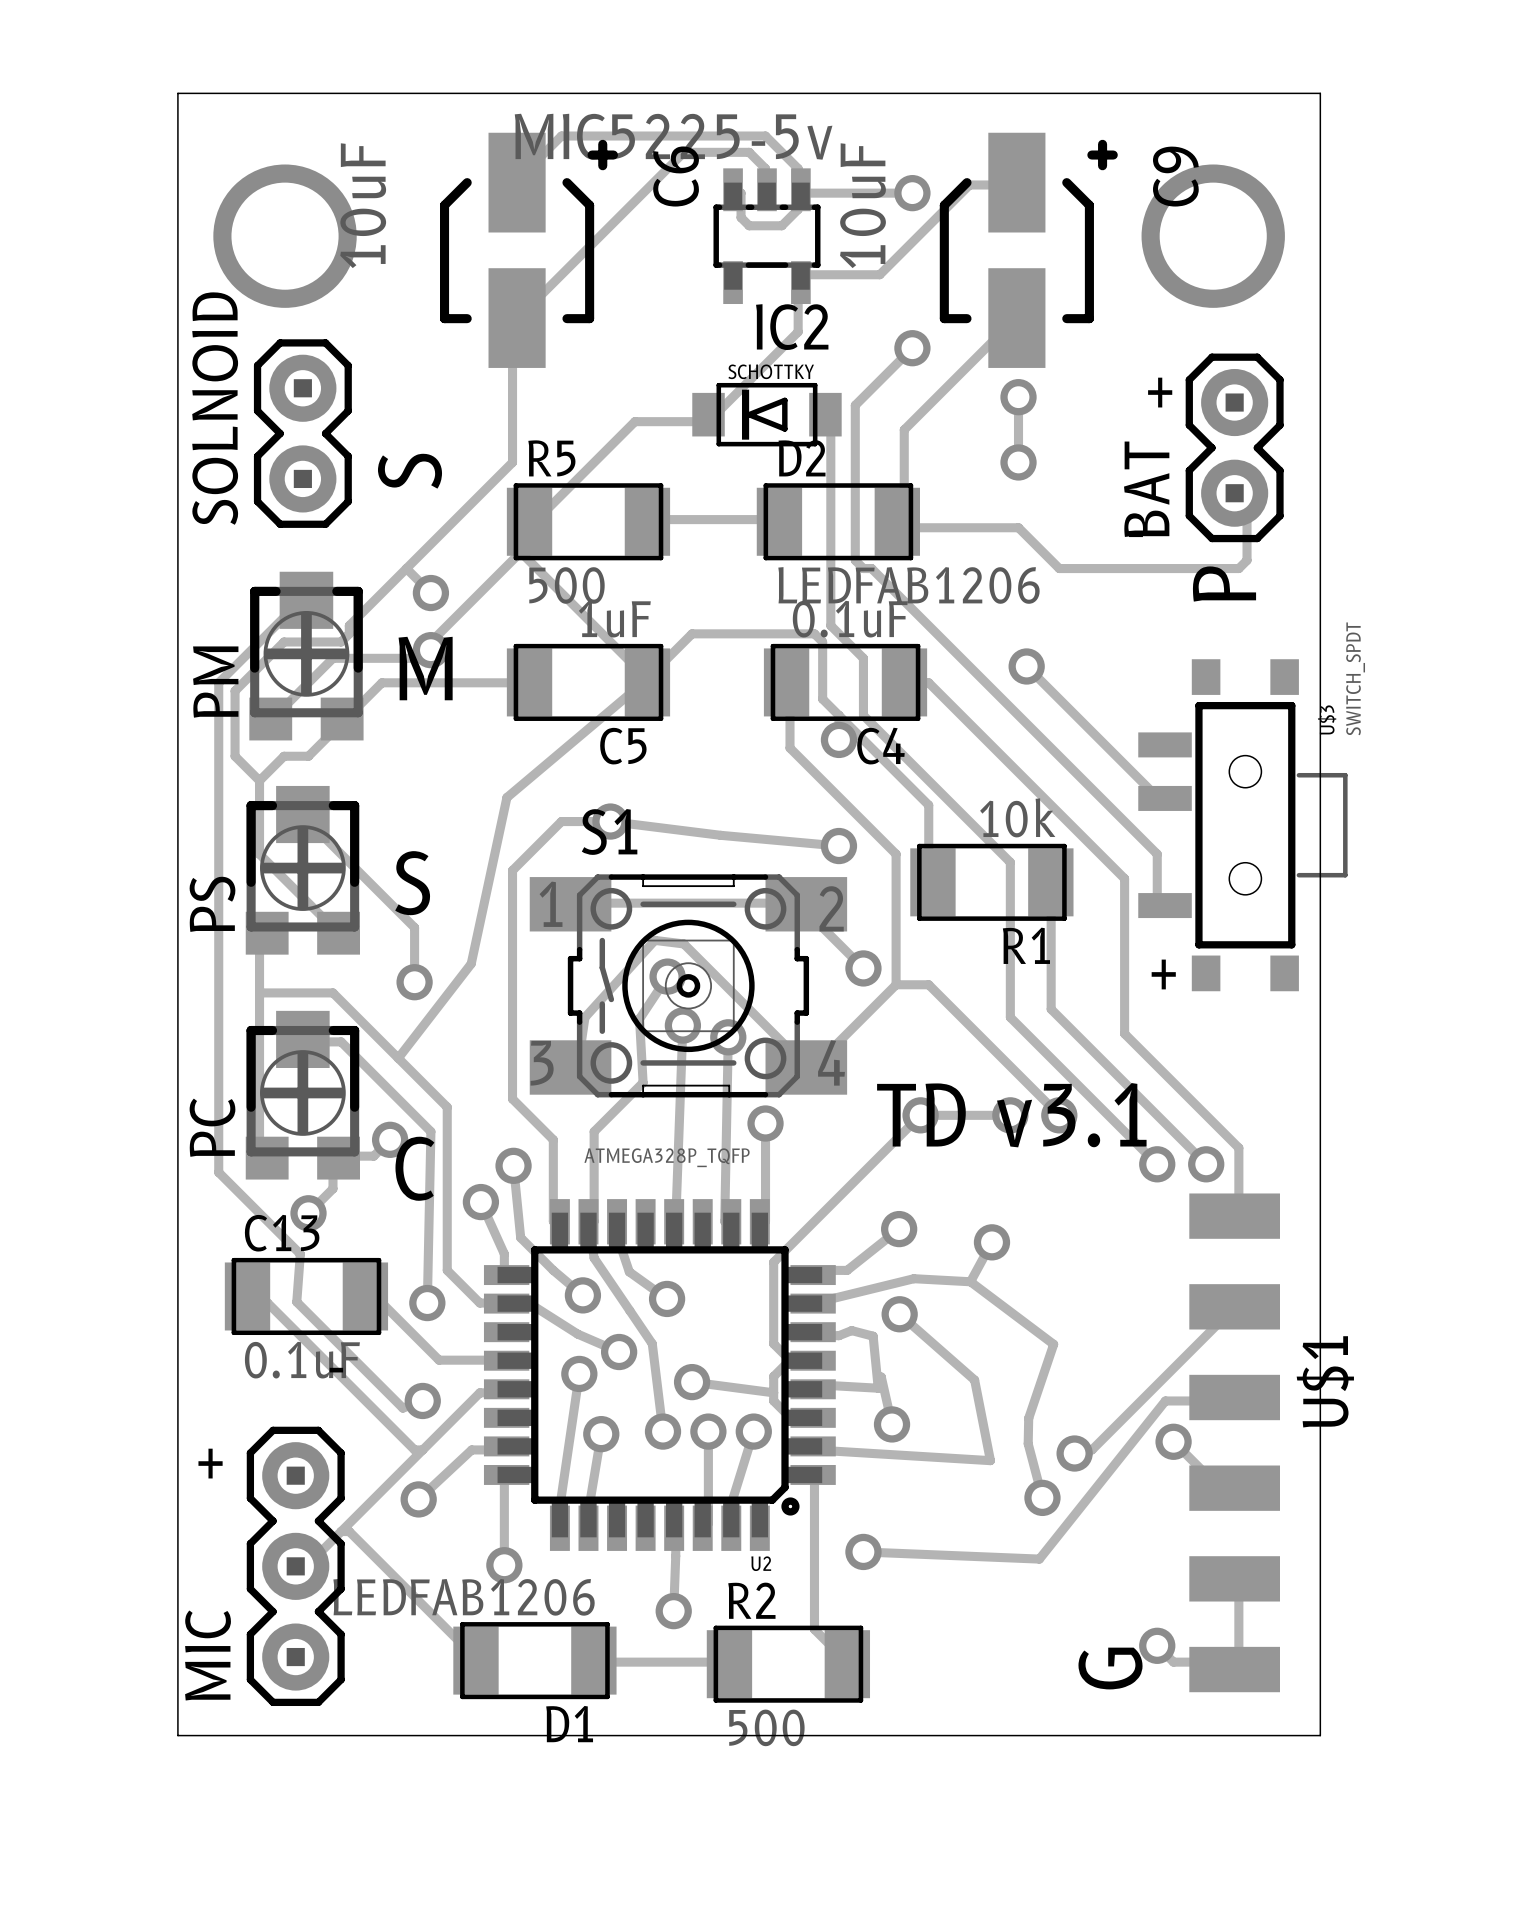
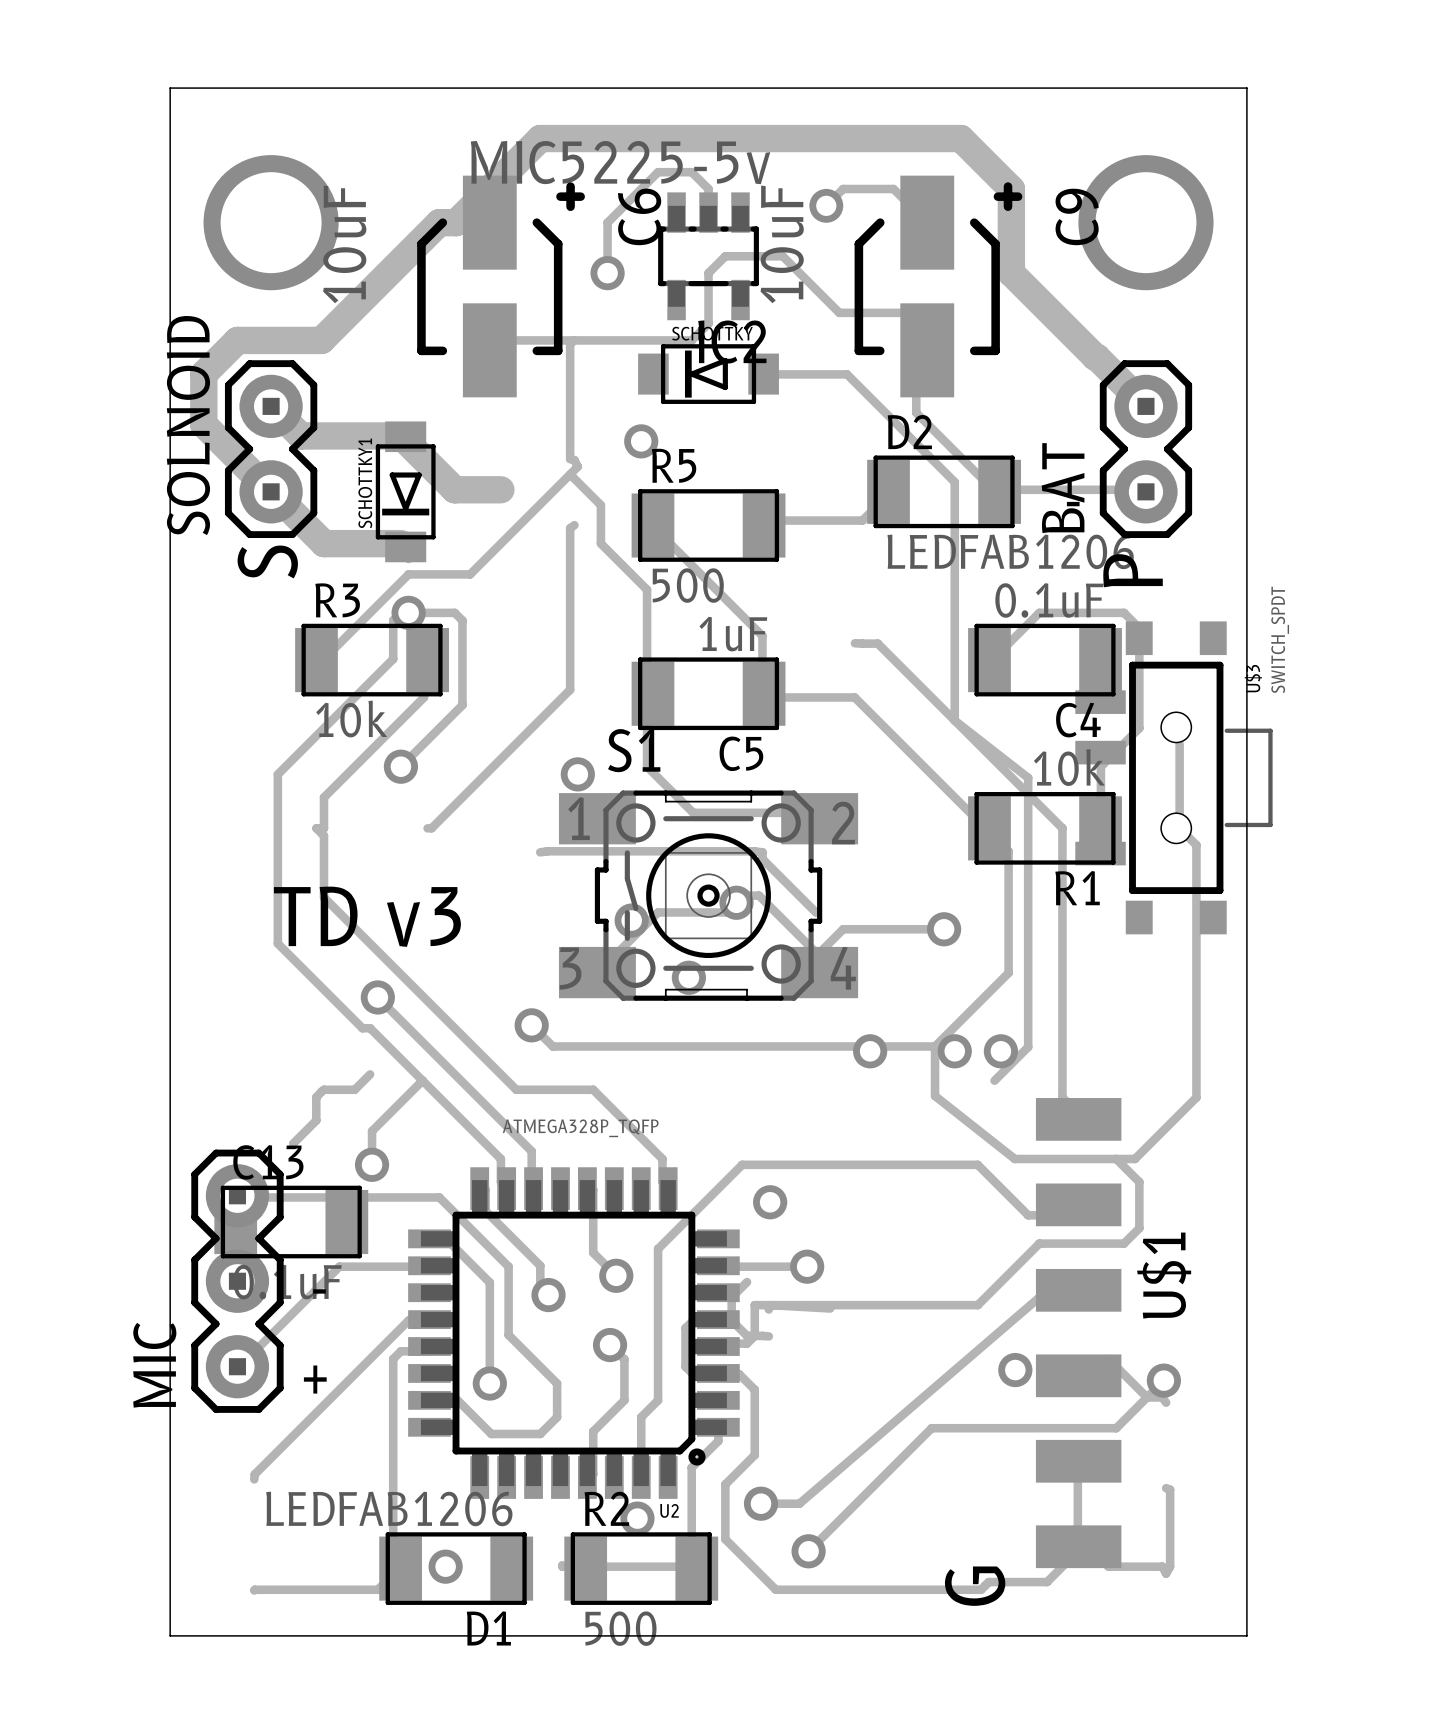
track: (517, 182) (561, 136) (765, 136) (798, 168) (798, 184) (800, 189) -> none
track: (1016, 182) (1010, 184) (969, 184) (879, 274) (806, 274) (800, 282) (798, 282) (798, 331) (716, 413) (708, 414) (708, 421) (634, 421) (537, 519) (529, 521) -> none
track: (733, 189) (741, 193) (741, 217) (749, 225) (781, 225) (798, 209) (798, 193) (800, 189) -> none
track: (766, 189) (765, 168) (749, 152) (683, 152) (517, 318) (512, 323) (512, 462) (349, 625) (349, 633) (341, 642) (284, 642) (235, 690) (235, 756) (259, 780) -> none
track: (800, 189) (806, 193) (912, 193) -> none
via: (912, 193) -> none
track: none -> (916, 189) (927, 222) (893, 189) (843, 189) (826, 205)
via: none -> (826, 205)
track: none -> (708, 212) (708, 189) (691, 172) (658, 172) (607, 222) (607, 273)
IC2 position: (766, 236) -> (708, 256)
C6 position: (529, 250) -> (501, 286)
C9 position: (1028, 250) -> (938, 286)
via: none -> (607, 273)
track: (1016, 318) (904, 429) (904, 519) (897, 521) (904, 527) (1018, 527) (1059, 568) (1238, 568) (1247, 560) (1247, 503) (1234, 493) -> none
track: none -> (508, 320) (489, 350) (499, 340) (691, 340) (708, 323) (708, 273) (725, 256) (782, 256) (839, 312) (908, 312) (927, 350) (916, 320) (916, 412) (993, 489) (999, 491) (1000, 489) (1139, 489) (1145, 491)
track: (912, 348) (855, 405) (855, 560) (863, 568) (871, 568) (1157, 854) (1157, 903) (1165, 905) -> none
via: (912, 348) -> none
track: none -> (573, 340) (570, 344) (570, 459) (574, 460) (577, 466) (470, 574) (408, 574) (323, 659) (316, 660)
text: + (1160, 392) -> none
track: none -> (763, 374) (847, 374) (954, 482) (954, 720) (1028, 777) (1028, 1047) (994, 1080)
track: (1018, 397) (1018, 462) -> none
via: (1018, 397) -> none
SCHOTTKY position: (766, 414) -> (708, 374)
track: (825, 414) (830, 421) (830, 625) (863, 658) (863, 715) (1010, 862) (1010, 1017) (1157, 1164) -> none
track: none -> (1139, 405) (1145, 406) (1011, 273) (1011, 189) (960, 138) (540, 138) (456, 222) (439, 222) (321, 340) (237, 340) (203, 374) (203, 424) (323, 543) (400, 543) (405, 546)
track: none -> (271, 406) (300, 435) (405, 436) (408, 443) (454, 489) (500, 489) (506, 492)
SOLNOID position: (302, 433) -> (271, 449)
BAT position: (1234, 447) -> (1145, 449)
via: (1018, 462) -> none
via: none -> (641, 441)
text position: S (410, 471) -> S (267, 561)
track: none -> (570, 474) (600, 505) (600, 543) (647, 589) (647, 689) (652, 693) (647, 697) (647, 766) (693, 812) (816, 812) (819, 818)
SCHOTTKY1: none -> (405, 491)
track: (529, 521) (528, 544) (422, 650) -> none
track: (529, 521) (520, 552) (643, 674) (647, 682) -> none
R5 position: (588, 521) -> (708, 525)
track: (647, 521) (651, 519) (773, 519) (779, 521) -> none
D2 position: (838, 521) -> (944, 491)
track: none -> (888, 491) (885, 497) (862, 520) (770, 520) (764, 525)
track: none -> (647, 520) (762, 635) (762, 689) (764, 693) (770, 697) (854, 697) (985, 828) (989, 828) (993, 835) (1008, 851) (1008, 972) (935, 1046)
track: none -> (574, 525) (570, 528) (570, 689) (431, 828) (427, 828)
text position: P (1224, 584) -> P (1133, 570)
via: (430, 593) -> none
track: (306, 600) (300, 601) (218, 682) (218, 1172) (300, 1254) (296, 1302) (402, 1408) (422, 1400) -> none
track: none -> (408, 612) (454, 612) (462, 620) (462, 705) (400, 766)
PM: (306, 656) -> none
track: (414, 658) (332, 658) (270, 719) -> (393, 620) (393, 659) (277, 774) (277, 943) (362, 1028) (370, 1028)
track: (1026, 666) (1157, 797) (1165, 798) -> none
via: (1026, 666) -> none
text: M (425, 668) -> none
track: (529, 682) (381, 682) (349, 715) (342, 719) (341, 723) (308, 756) (284, 756) (259, 780) -> none
C5 position: (588, 682) -> (708, 693)
track: (647, 682) (651, 674) (692, 633) (814, 633) (822, 642) (822, 699) (928, 805) (928, 878) (932, 882) -> none
track: (647, 682) (643, 682) (506, 797) (471, 963) (398, 1058) (332, 992) (259, 992) -> none
track: (786, 682) (790, 682) (790, 748) (896, 854) (896, 984) -> none
C4 position: (845, 682) -> (1045, 660)
R3: none -> 10k (372, 660)
track: none -> (427, 660) (423, 666) (423, 697) (323, 797) (323, 828) (316, 828) (323, 835) (323, 897) (516, 1089) (593, 1089) (662, 1159) (662, 1182) (668, 1188)
track: none -> (989, 660) (993, 659) (1039, 612) (1123, 612) (1139, 628) (1139, 728) (1100, 766) (1100, 828)
via: (838, 739) -> none
track: (259, 780) (259, 854) (338, 933) -> none
track: none -> (1179, 744) (1179, 828) (1196, 845) (1196, 1097) (1134, 1159) (1014, 1159) (935, 1096) (935, 1046)
via: none -> (400, 766)
track: (302, 814) (414, 927) (414, 982) -> none
track: (838, 846) (720, 835) (610, 821) (561, 821) (512, 870) (512, 1099) (553, 1139) (553, 1221) (559, 1221) -> none
via: (838, 846) -> none
PS: (302, 870) -> none
R1 position: (991, 882) -> (1045, 828)
track: (1050, 882) (1051, 1009) (1206, 1164) -> none
text: S (412, 883) -> none
track: (267, 933) (259, 935) (259, 1156) (267, 1158) -> none
via: none -> (736, 902)
via: (863, 968) -> none
text: none -> TD v3 (367, 916)
text: + (1163, 974) -> none
track: (667, 976) (639, 1018) (643, 1082) (594, 1131) (594, 1221) (588, 1221) (594, 1258) (652, 1343) (663, 1431) -> none
via: (414, 982) -> none
track: (896, 984) (806, 1074) (806, 1066) (683, 943) (654, 940) (584, 1017) (577, 1066) (570, 1067) -> none
track: (896, 984) (928, 984) (1059, 1115) -> none
S1 position: (688, 985) -> (708, 895)
track: none -> (944, 929) (843, 929) (823, 948) (823, 974) (819, 972) (816, 974) (816, 952) (759, 895) (743, 895) (726, 912) (658, 912) (600, 969) (600, 974) (597, 972)
via: none -> (944, 929)
track: (682, 1025) (675, 1221) (674, 1221) -> none
via: (682, 1025) -> none
track: (1124, 1033) (1238, 1147) (1238, 1213) (1234, 1216) -> (1062, 974) (1062, 1097) (1077, 1112) (1078, 1119)
track: (728, 1037) (724, 1221) (731, 1221) -> none
track: (302, 1039) (308, 1041) (341, 1041) (390, 1090) -> none
via: none -> (377, 997)
track: none -> (531, 1025) (552, 1046) (935, 1046)
via: none -> (531, 1025)
PC: (302, 1095) -> none
track: (447, 1107) (447, 1270) (479, 1303) (528, 1303) (577, 1334) (619, 1352) -> (423, 1043) (531, 1151) (531, 1182) (533, 1188)
track: (1010, 1115) (920, 1115) (773, 1262) (773, 1343) (790, 1360) (813, 1360) -> none
text: TD v3.1 (1011, 1115) -> none
track: (765, 1123) (765, 1221) (759, 1221) -> none
via: (765, 1123) -> none
track: (430, 1131) (427, 1303) -> (408, 1066) (500, 1159) (500, 1182) (506, 1188)
via: (390, 1139) -> none
track: none -> (422, 1080) (372, 1131) (372, 1164)
via: (1157, 1164) -> none
via: (1206, 1164) -> none
track: (513, 1165) (520, 1237) (553, 1270) (582, 1295) -> none
via: (513, 1165) -> none
text: C (414, 1168) -> none
track: (480, 1202) (504, 1254) (504, 1270) (506, 1275) -> none
via: (480, 1202) -> none
via: (308, 1213) -> none
track: (617, 1221) (615, 1229) (629, 1271) (667, 1298) -> none
track: (899, 1229) (847, 1270) (814, 1270) (813, 1275) -> none
via: (899, 1229) -> none
track: none -> (1116, 1159) (1139, 1182) (1139, 1228) (1123, 1243) (1039, 1243) (977, 1305) (754, 1305) (754, 1335) (747, 1343) (723, 1343) (718, 1346)
via: none -> (372, 1164)
track: (991, 1242) (970, 1281) -> none
via: (991, 1242) -> none
track: none -> (479, 1188) (485, 1189) (485, 1211) (540, 1265) (540, 1299)
track: none -> (587, 1188) (593, 1189) (593, 1252) (616, 1275)
track: none -> (237, 1195) (239, 1197) (439, 1197) (508, 1266) (508, 1335) (557, 1383) (557, 1417) (540, 1434) (491, 1434) (454, 1397) (431, 1397) (429, 1400)
via: none -> (770, 1202)
track: none -> (1077, 1205) (1068, 1215) (1028, 1215) (977, 1164) (742, 1164) (658, 1248) (658, 1400) (641, 1417) (641, 1477)
track: (970, 1281) (913, 1278) (813, 1303) -> none
track: (970, 1281) (1053, 1344) (1028, 1418) (1028, 1443) (1042, 1497) -> none
via: (582, 1295) -> none
track: (247, 1296) (267, 1303) (414, 1449) (422, 1449) -> none
track: (365, 1296) (381, 1303) (439, 1360) (506, 1360) -> none
via: (667, 1298) -> none
via: (427, 1303) -> none
track: (1234, 1306) (1091, 1449) (1074, 1453) -> none
track: none -> (429, 1238) (431, 1243) (450, 1243) (489, 1282) (489, 1383)
track: (899, 1314) (974, 1380) (990, 1460) (814, 1449) (813, 1446) -> none
via: (899, 1314) -> none
track: (813, 1332) (814, 1335) (838, 1335) (851, 1330) (873, 1336) (878, 1388) (881, 1377) (892, 1424) -> none
track: none -> (429, 1265) (339, 1266) (237, 1366)
track: none -> (718, 1265) (807, 1266)
via: none -> (807, 1266)
via position: (619, 1352) -> (616, 1275)
track: none -> (1078, 1290) (1077, 1297) (1039, 1297) (799, 1503) (761, 1503)
track: (579, 1373) (557, 1519) (559, 1528) -> none
U2 position: (659, 1375) -> (573, 1333)
track: (692, 1382) (773, 1392) -> none
via: (692, 1382) -> none
track: (506, 1389) (504, 1392) (479, 1392) (300, 1572) (295, 1566) -> none
track: (1234, 1397) (1230, 1400) (1165, 1400) (1039, 1559) (863, 1551) -> none
via: (422, 1400) -> none
track: none -> (429, 1319) (408, 1320) (254, 1474) (254, 1479)
track: none -> (718, 1319) (693, 1320) (685, 1328) (685, 1366) (693, 1374) (739, 1374) (754, 1389) (754, 1455) (725, 1484) (725, 1539) (775, 1589) (981, 1589) (988, 1582) (1047, 1582) (1077, 1551) (1078, 1461)
via: (892, 1424) -> none
track: none -> (610, 1345) (624, 1359) (624, 1400) (593, 1431) (593, 1474) (587, 1477)
track: none -> (429, 1346) (423, 1351) (400, 1351) (393, 1358) (393, 1566) (400, 1568) (377, 1589) (254, 1590)
via position: (663, 1431) -> (610, 1345)
track: (708, 1431) (708, 1523) (702, 1528) -> none
via: (708, 1431) -> none
track: (753, 1431) (732, 1498) (731, 1528) -> none
via: (753, 1431) -> none
track: (601, 1434) (587, 1519) (588, 1528) -> none
via: (601, 1434) -> none
via position: (1173, 1441) -> (1163, 1380)
U$1 position: (1234, 1442) -> (1078, 1333)
track: (506, 1446) (504, 1449) (471, 1449) (418, 1499) -> none
text position: + (210, 1463) -> + (315, 1379)
track: none -> (1163, 1380) (1116, 1428) (931, 1428) (808, 1551)
via: none -> (489, 1383)
track: (506, 1474) (504, 1482) (504, 1565) -> none
track: (813, 1474) (814, 1629) (847, 1664) -> none
via: (1042, 1497) -> none
via: (418, 1499) -> none
track: none -> (718, 1427) (718, 1440) (691, 1467) (691, 1563) (696, 1568)
track: (674, 1528) (675, 1556) (673, 1611) -> none
track: (341, 1531) (349, 1531) (471, 1653) (475, 1660) -> none
via: (863, 1551) -> none
via: (504, 1565) -> none
MIC position: (295, 1566) -> (237, 1281)
via: none -> (761, 1503)
via: none -> (808, 1551)
via: (1157, 1645) -> none
D1 position: (534, 1660) -> (456, 1568)
via: none -> (445, 1566)
R2 position: (788, 1664) -> (641, 1568)
text position: G (1110, 1668) -> G (975, 1586)

